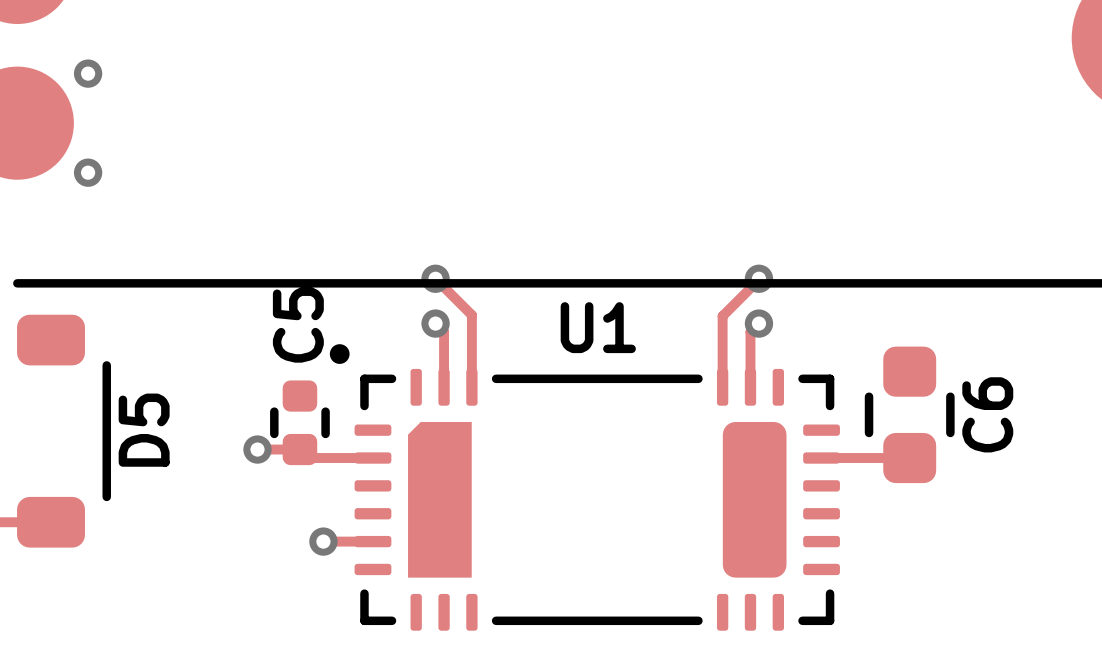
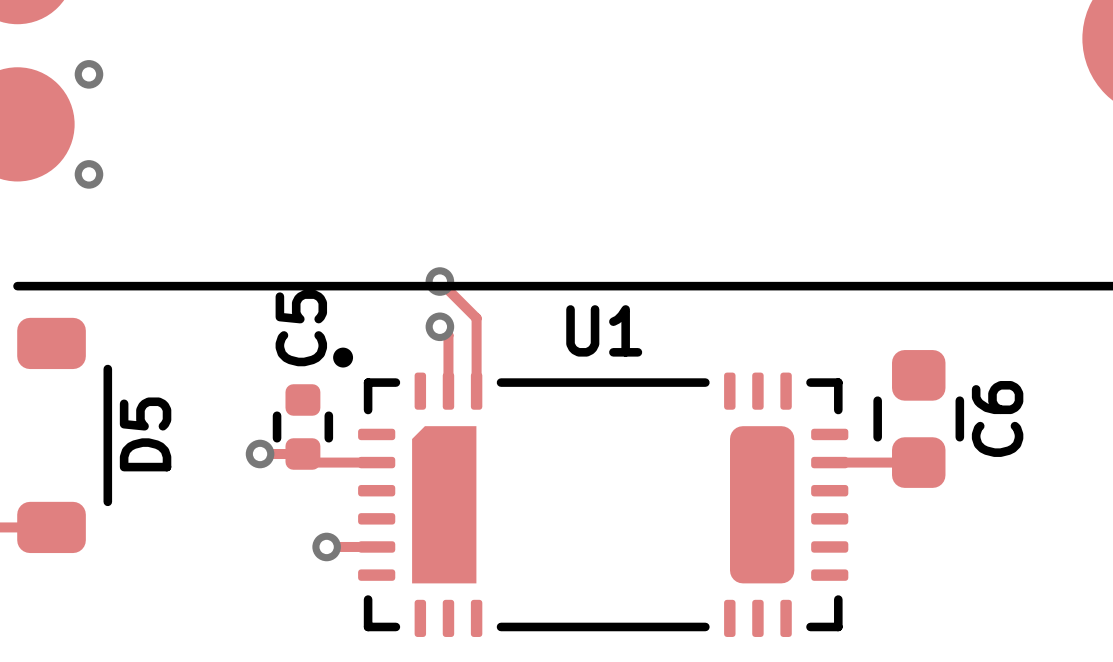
via: (758, 278) -> none
track: (758, 279) (722, 316) (722, 387) -> none
track: (758, 323) (750, 332) (750, 387) -> none
via: (758, 323) -> none

